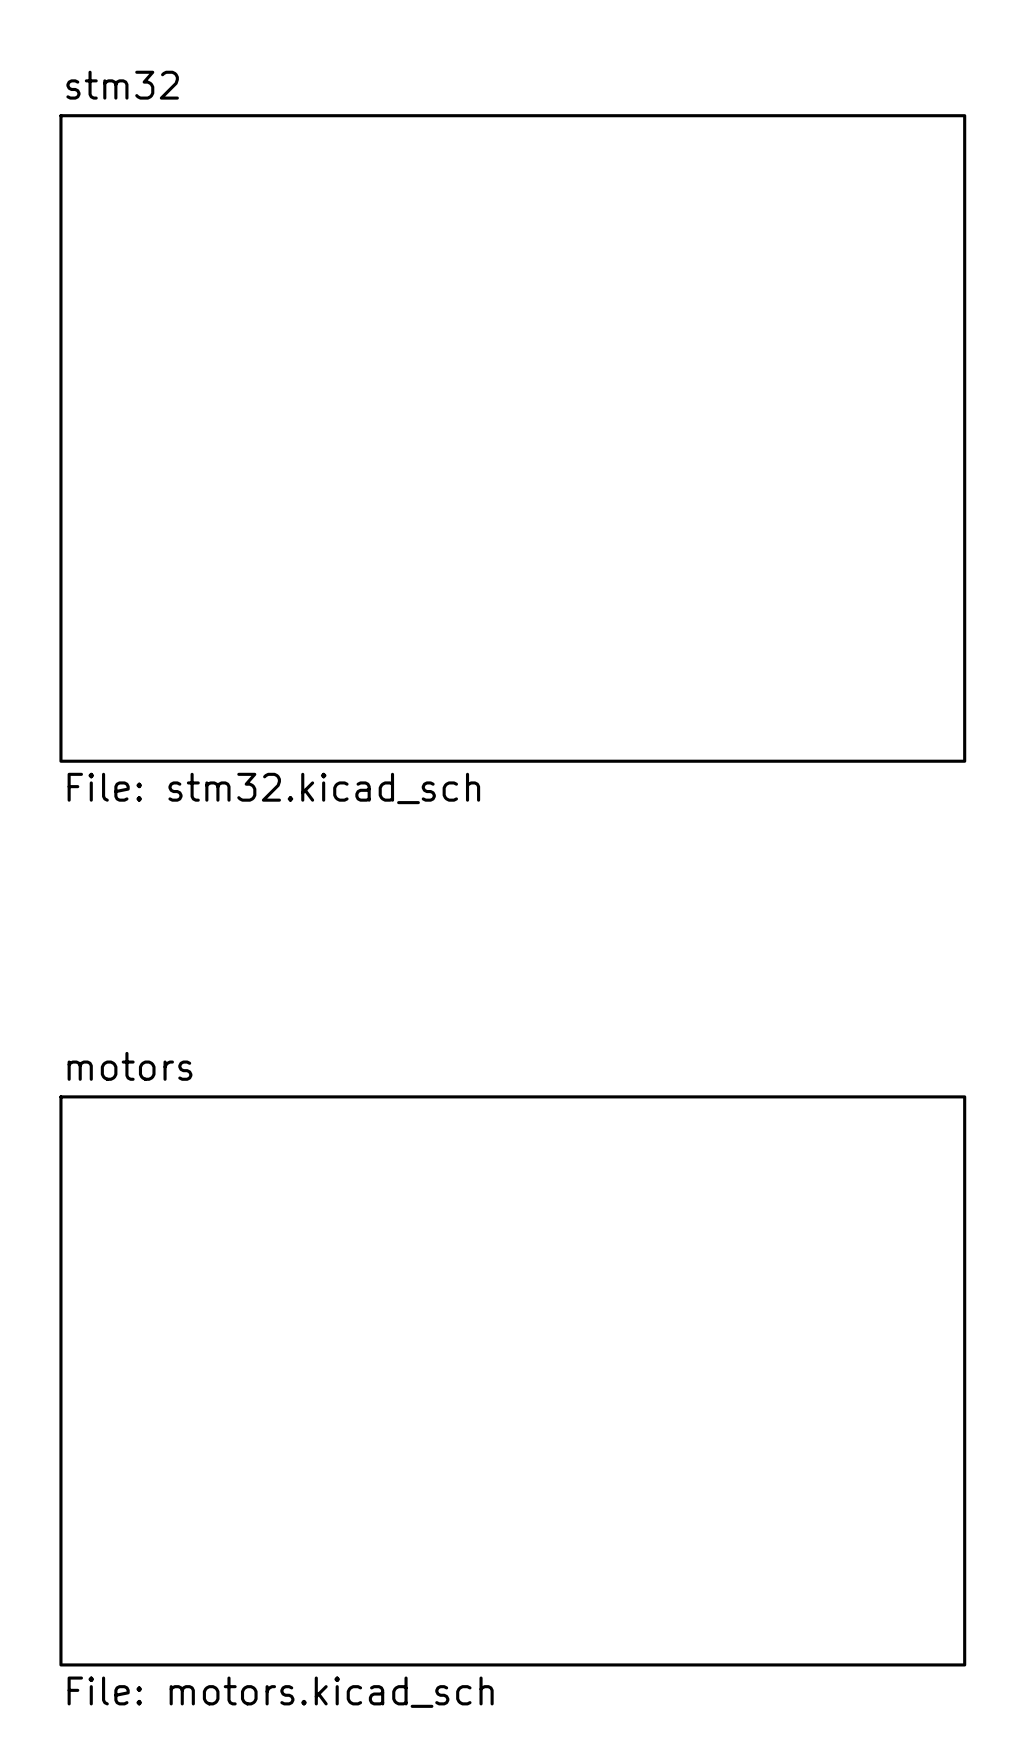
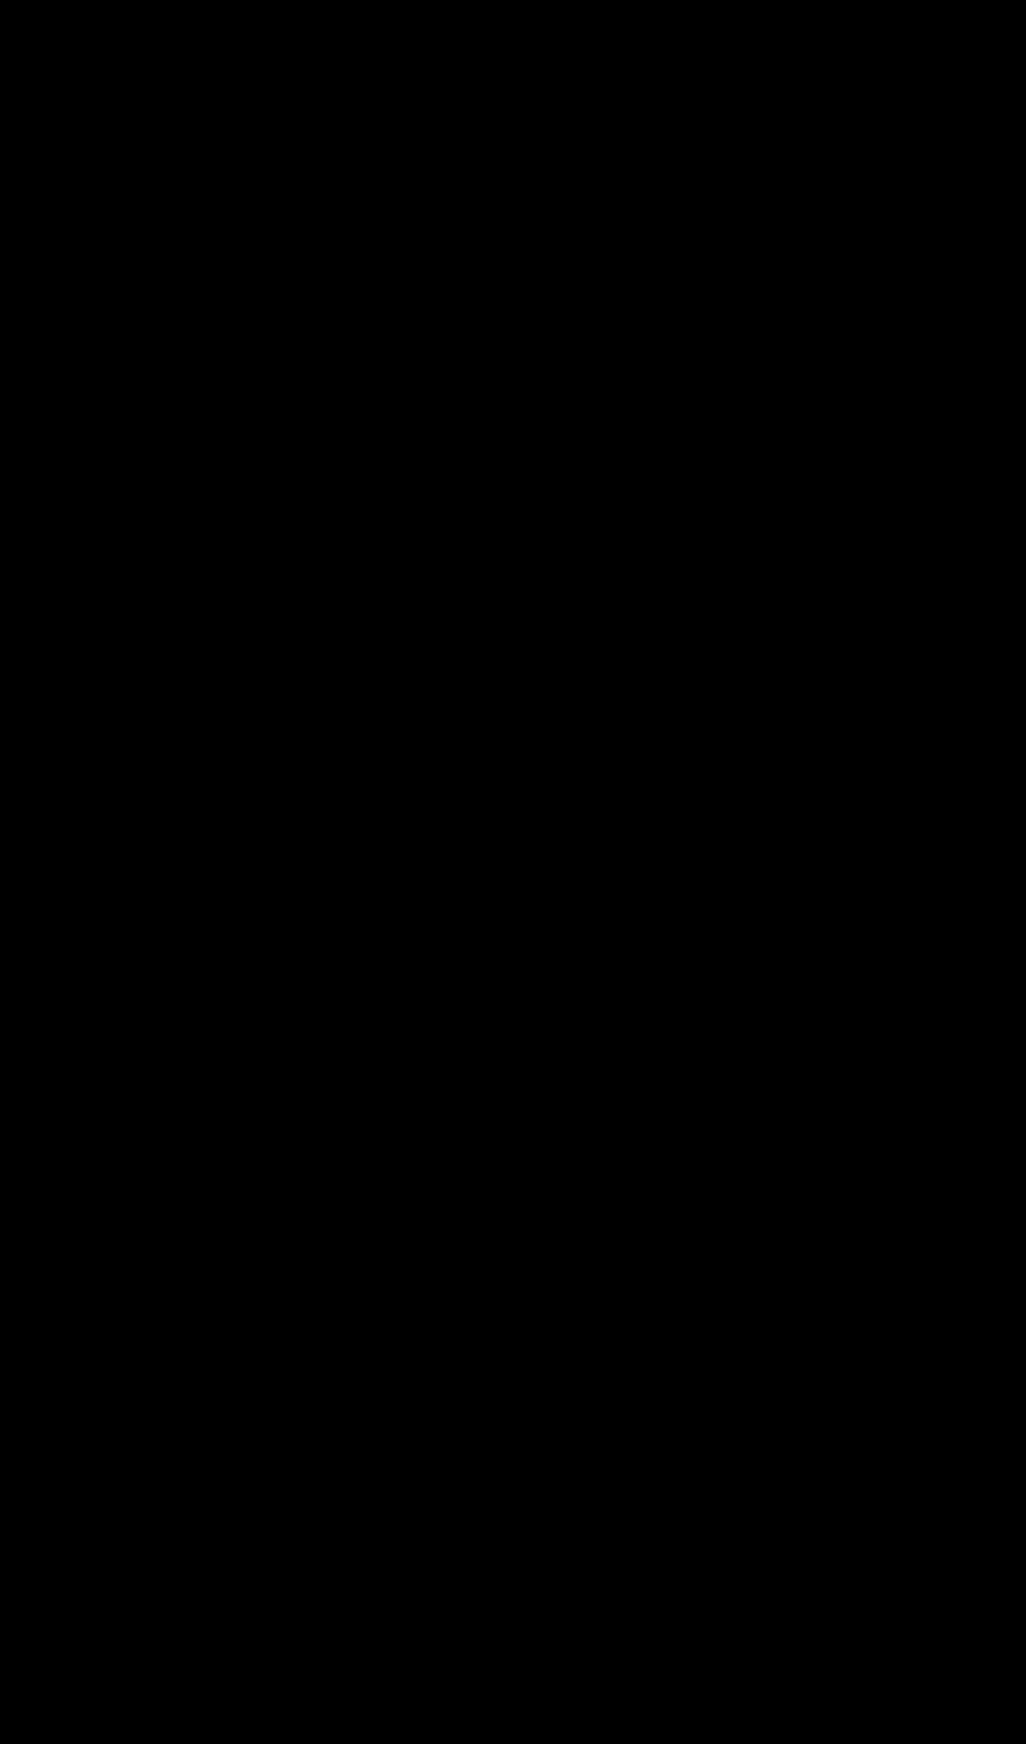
sheet stm32: File: stm32.kicad_sch (512, 438) -> none
sheet motors: File: motors.kicad_sch (512, 1380) -> none

